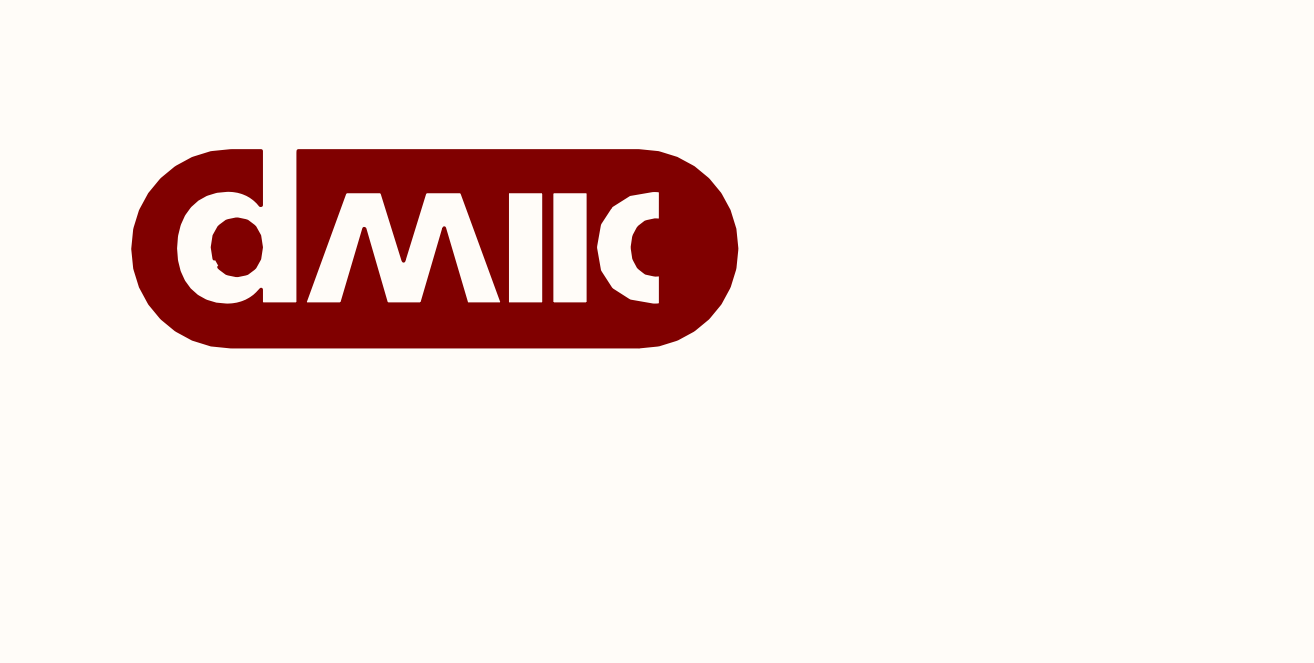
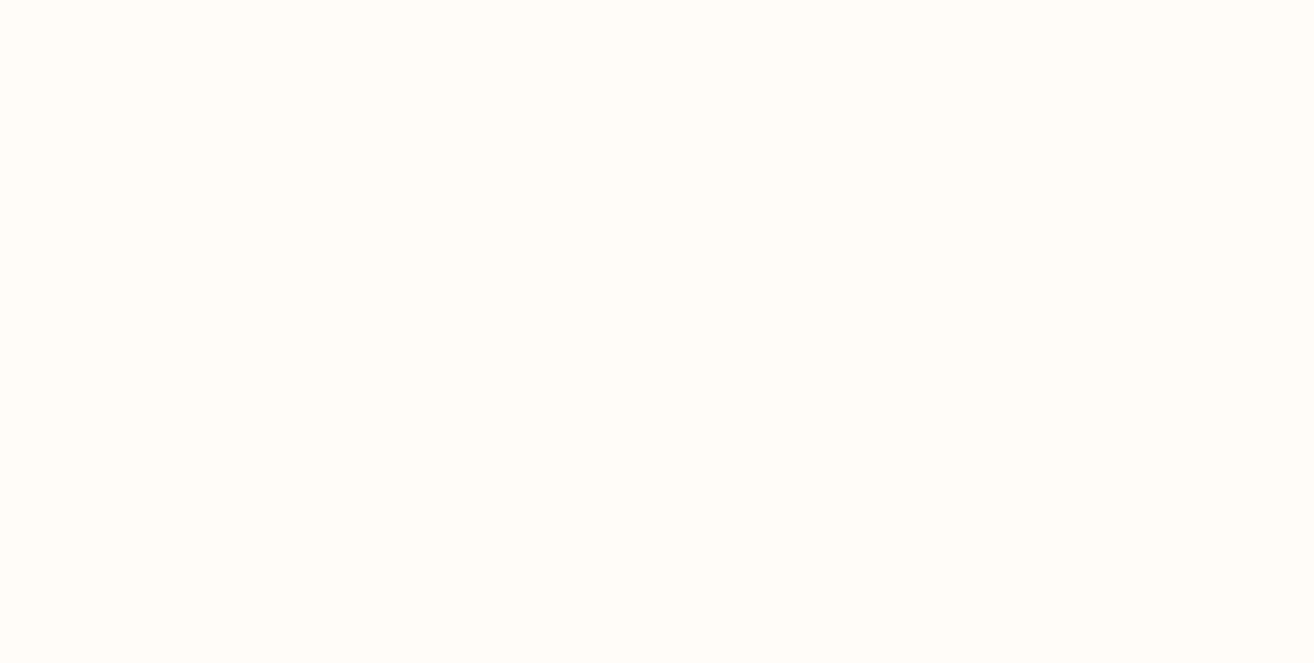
part: (434, 248) -> none

